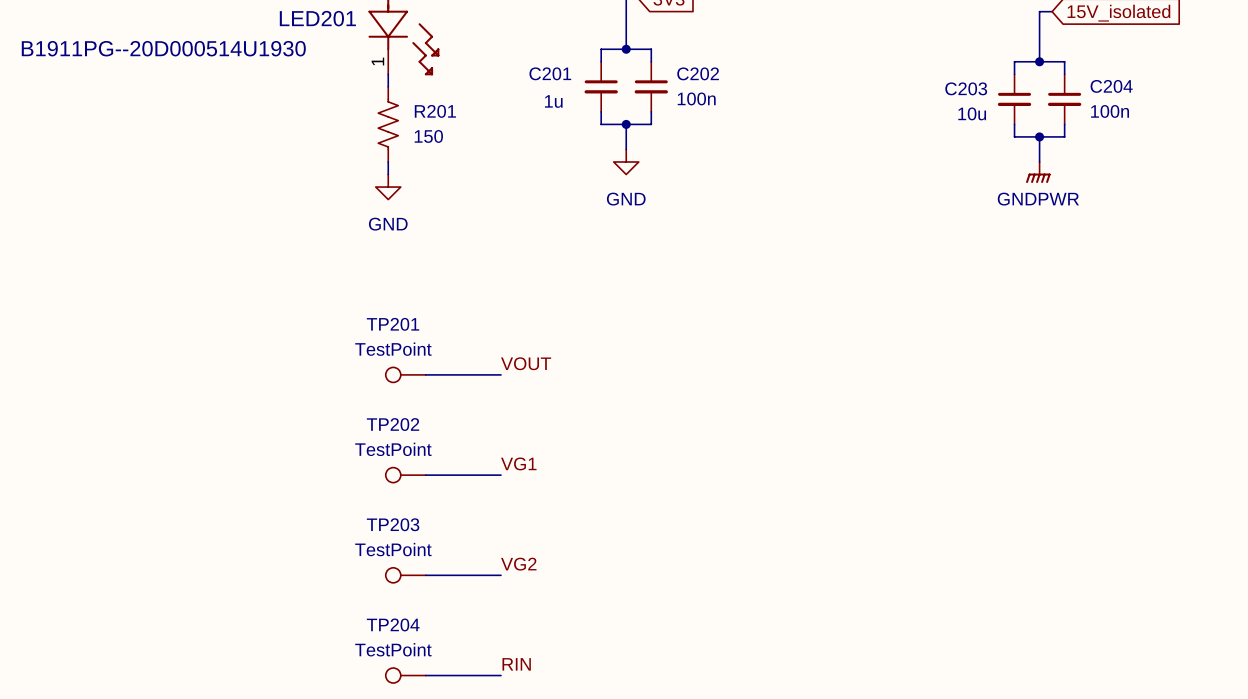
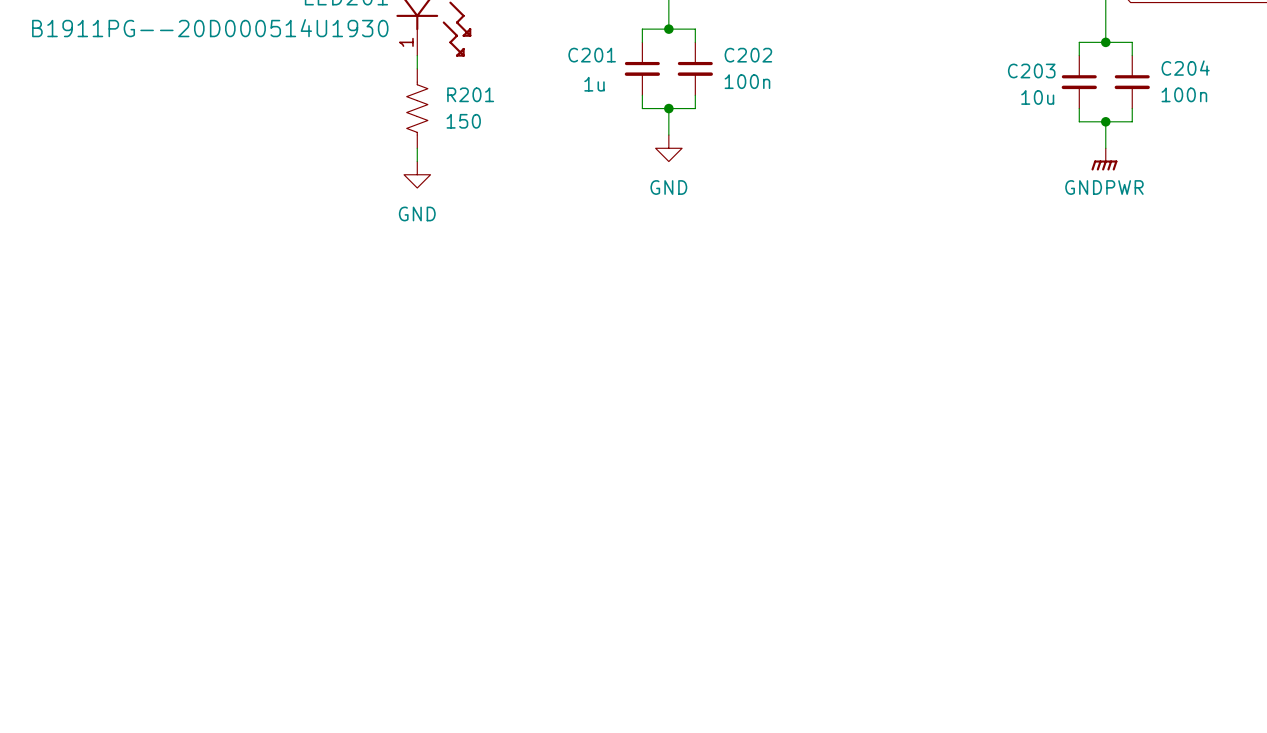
label: VOUT (526, 363) -> none
TP201: TestPoint (405, 374) -> none
wire: (425, 374) (500, 374) -> none
label: VG1 (518, 463) -> none
TP202: TestPoint (405, 475) -> none
wire: (425, 475) (500, 475) -> none
label: VG2 (518, 564) -> none
TP203: TestPoint (405, 575) -> none
wire: (425, 575) (500, 575) -> none
label: RIN (516, 664) -> none
TP204: TestPoint (405, 675) -> none
wire: (425, 675) (500, 675) -> none

